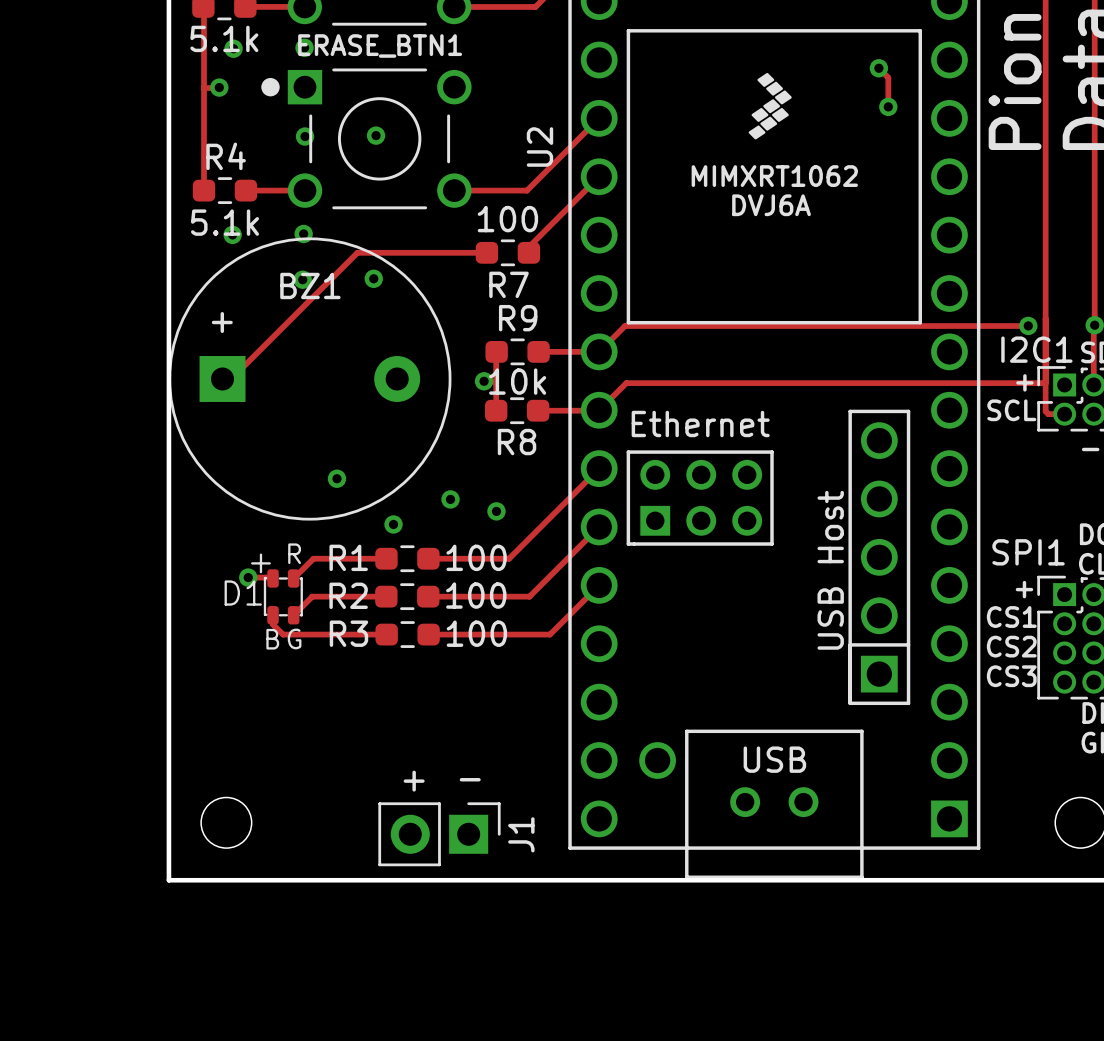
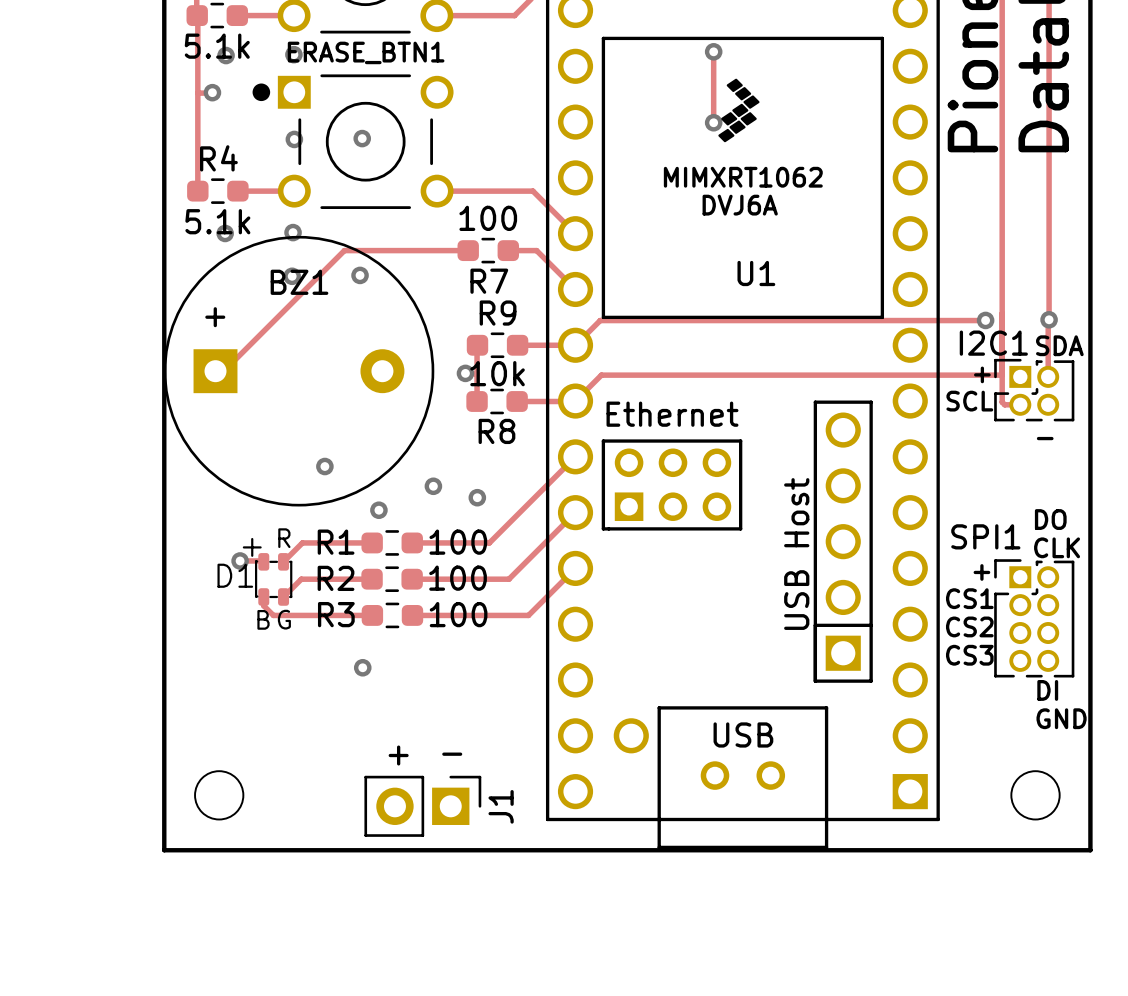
track: none -> (713, 51) (713, 122)
via: none -> (713, 51)
track: (878, 68) (888, 77) (888, 106) -> none
via: (878, 68) -> none
via: (888, 106) -> none
track: (599, 118) (526, 190) -> (575, 233) (532, 191) (506, 191)
via: none -> (713, 122)
U2 name: U2 (539, 147) -> U1 (756, 273)
track: (599, 176) (528, 247) -> none
track: none -> (508, 250) (536, 250) (575, 289)
via: none -> (362, 667)

